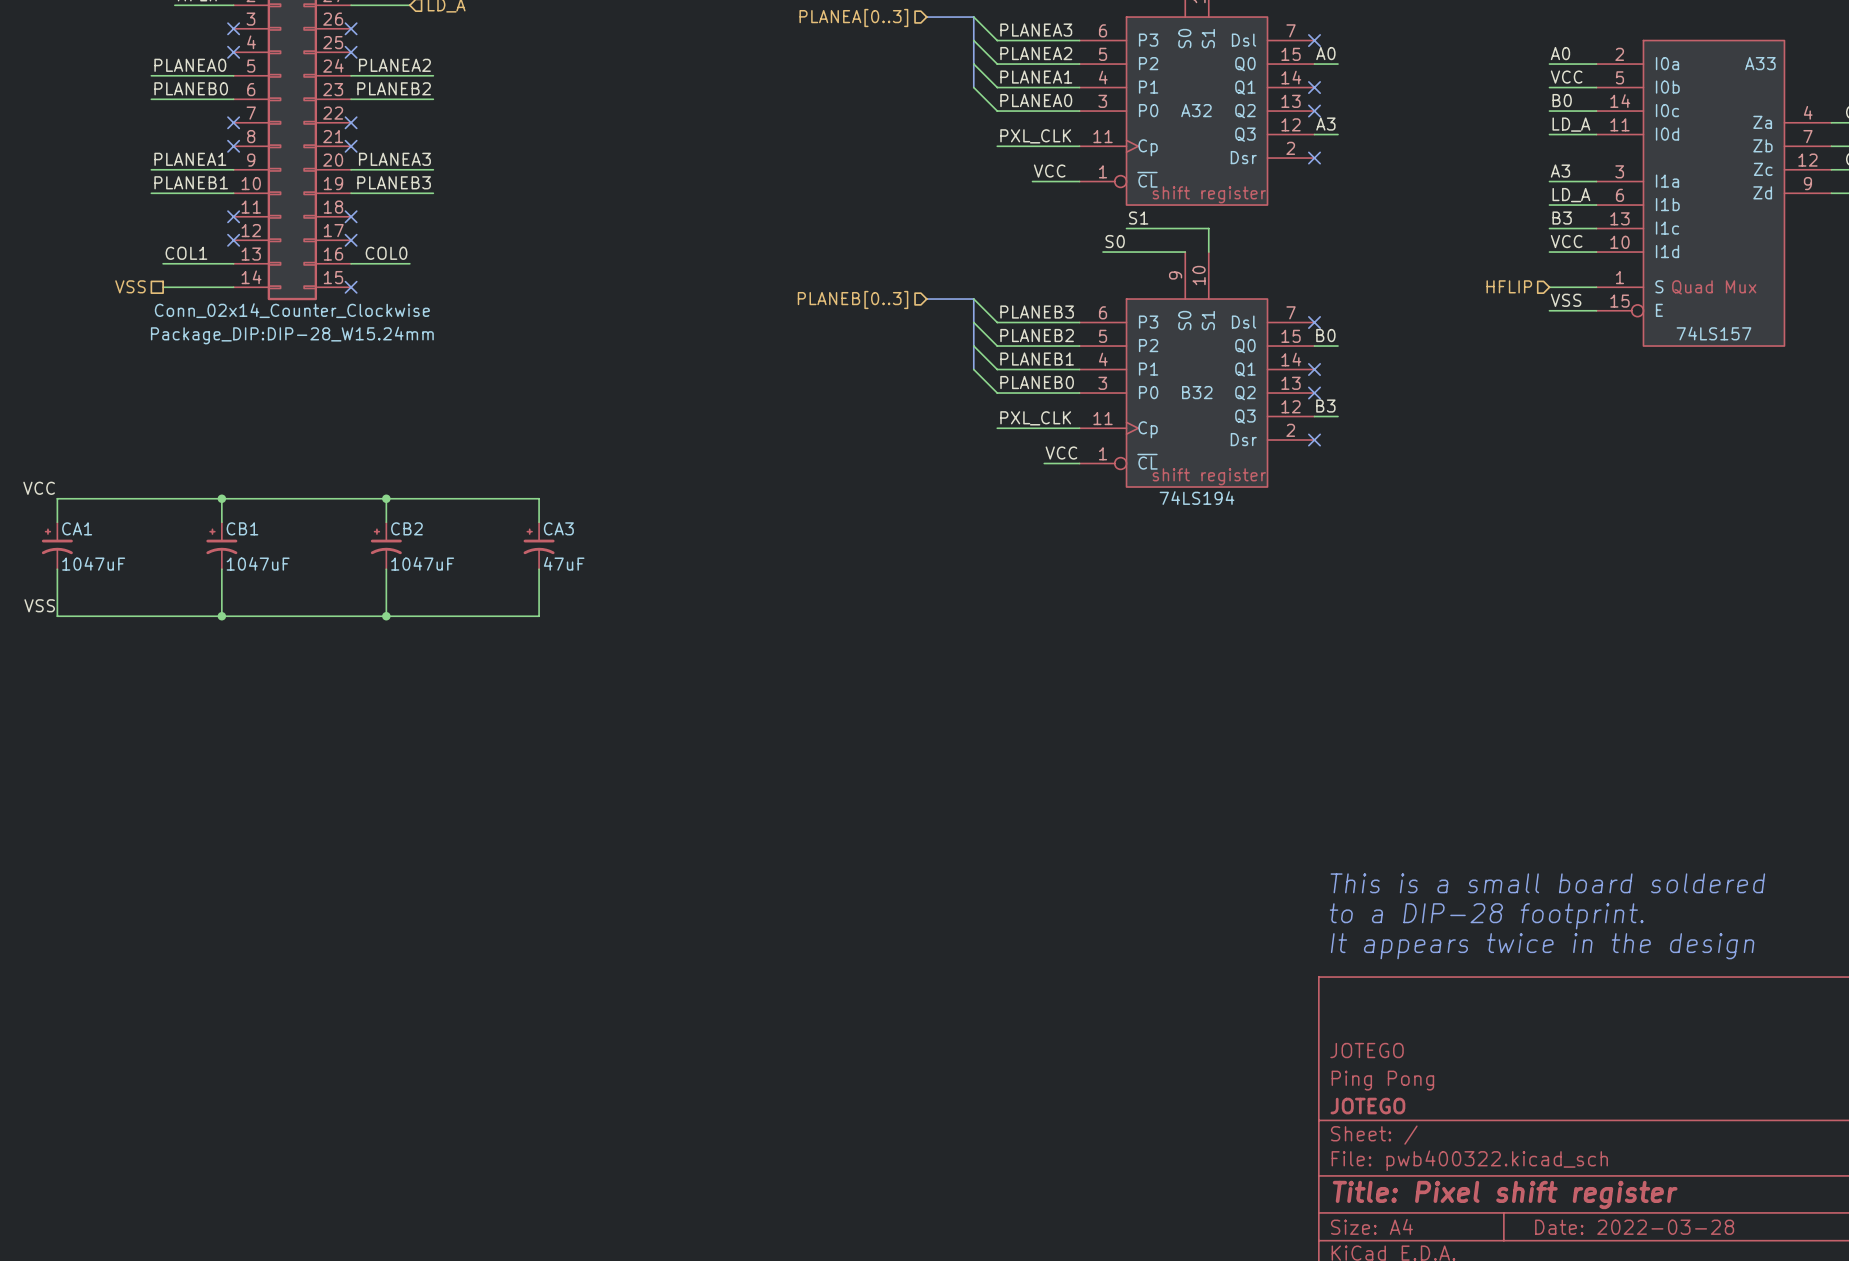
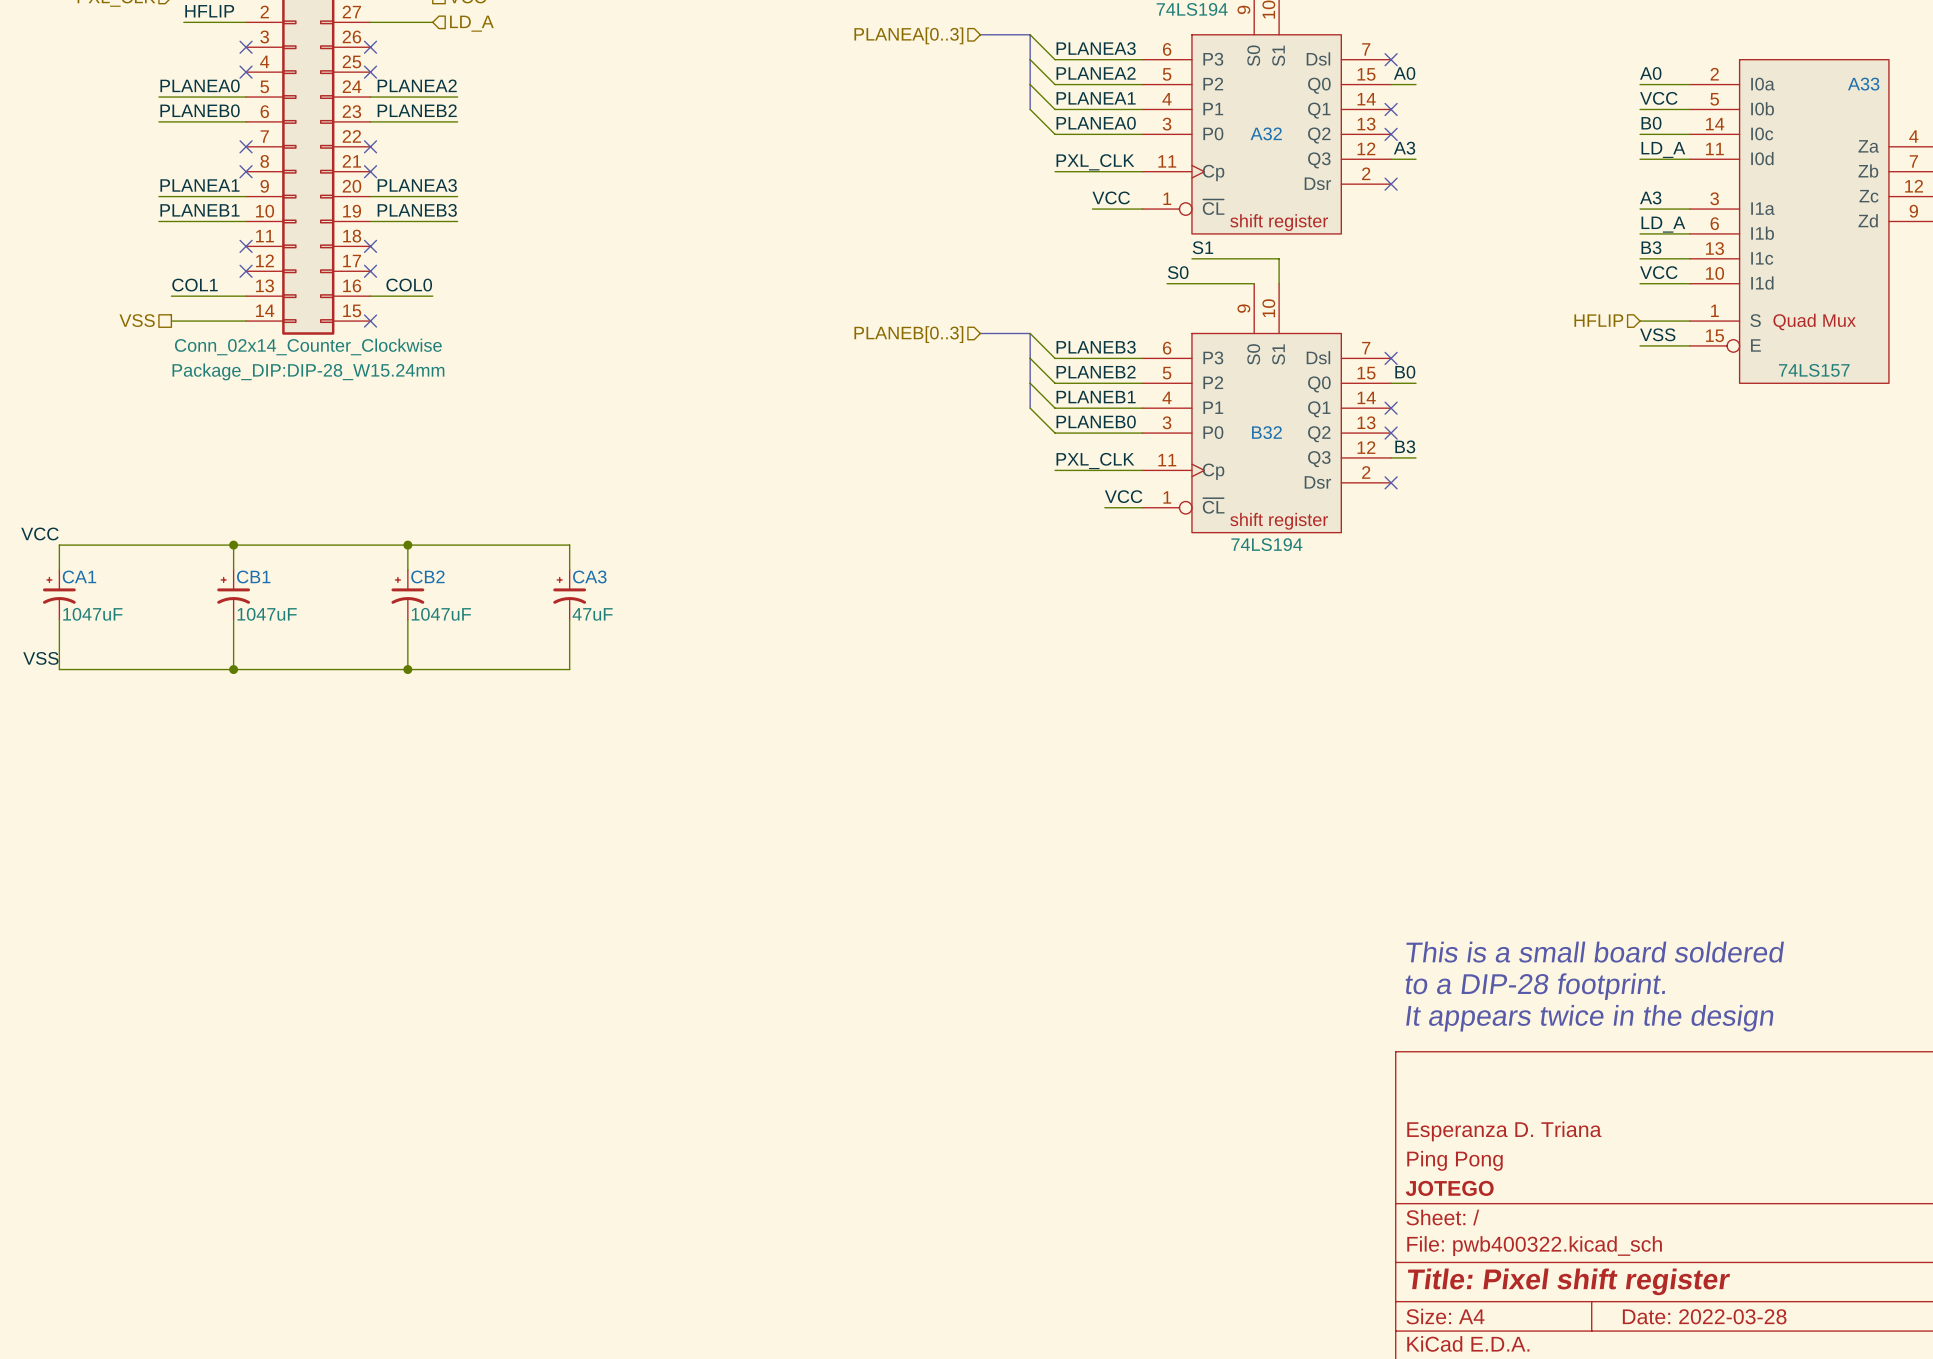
title block: JOTEGO (1367, 1050) -> Esperanza D. Triana (1504, 1131)

